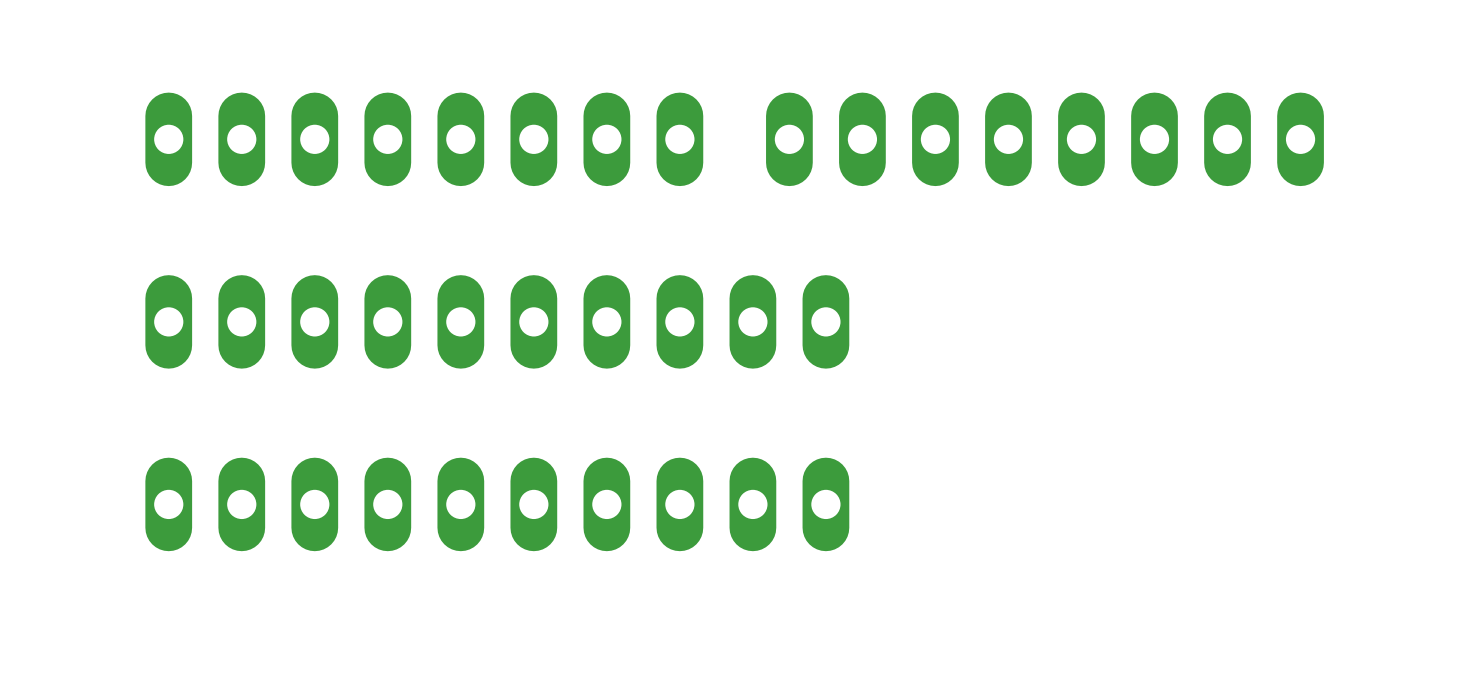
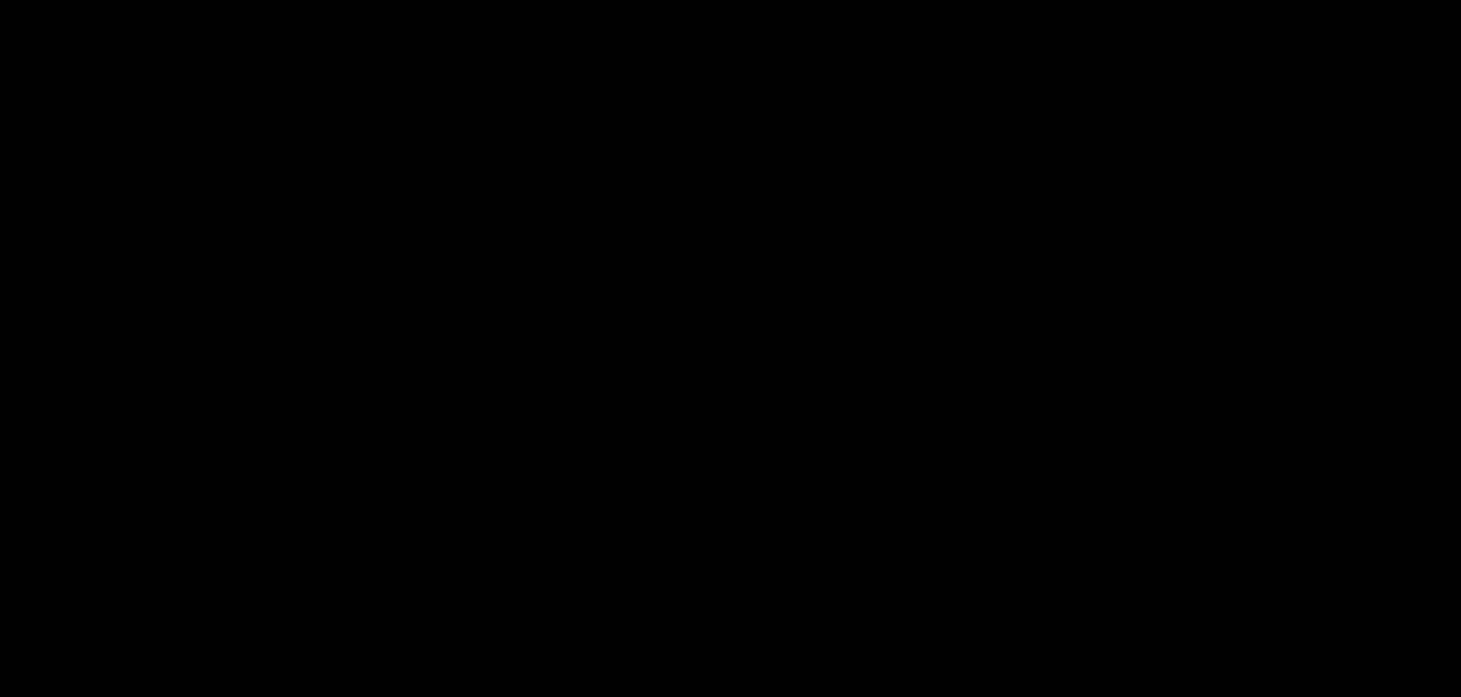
part: (424, 139) -> none
part: (1044, 139) -> none
part: (497, 321) -> none
part: (497, 504) -> none

